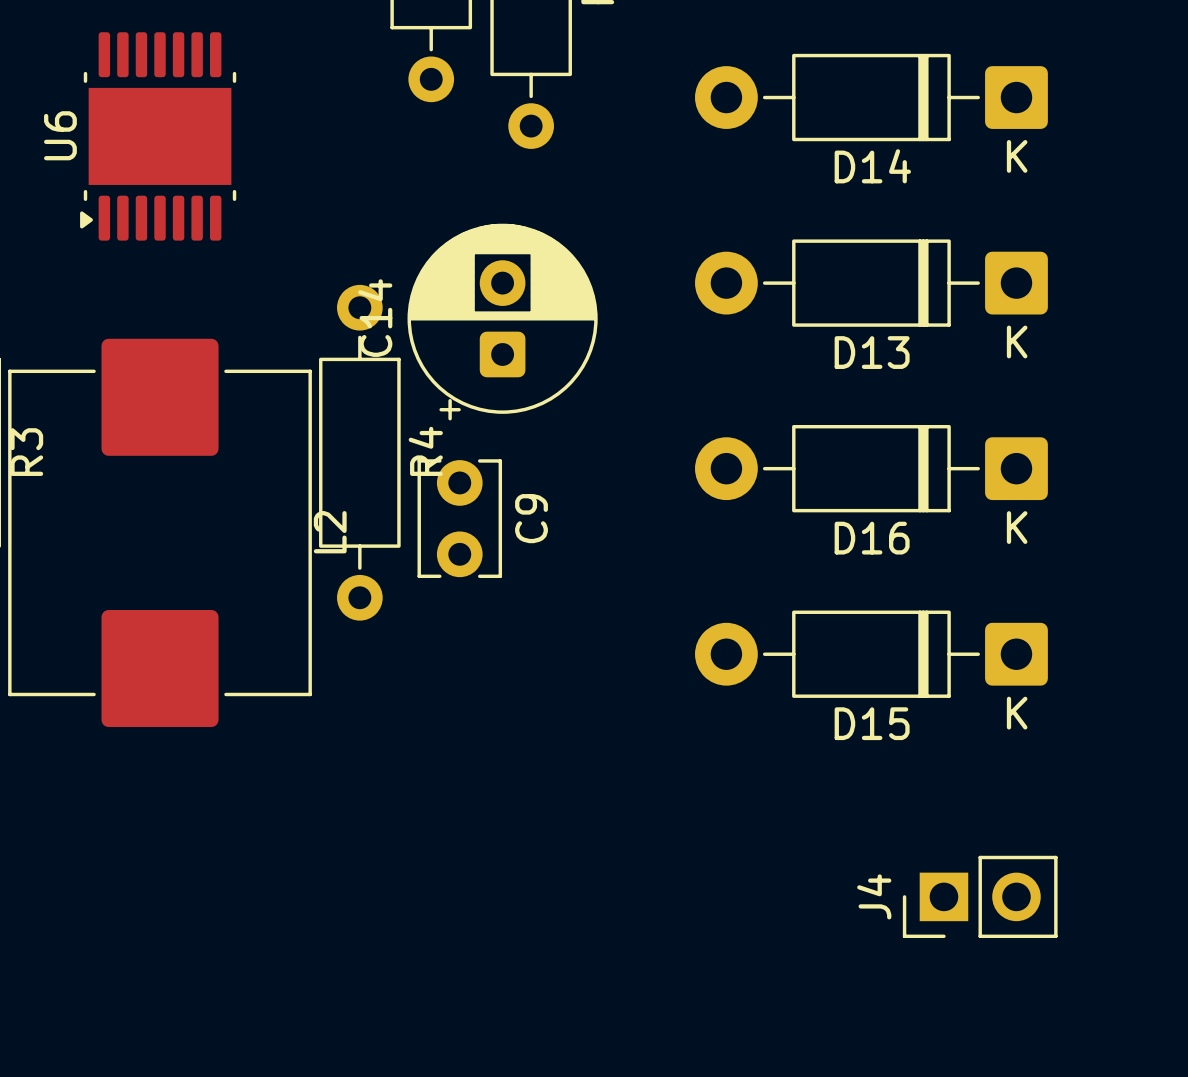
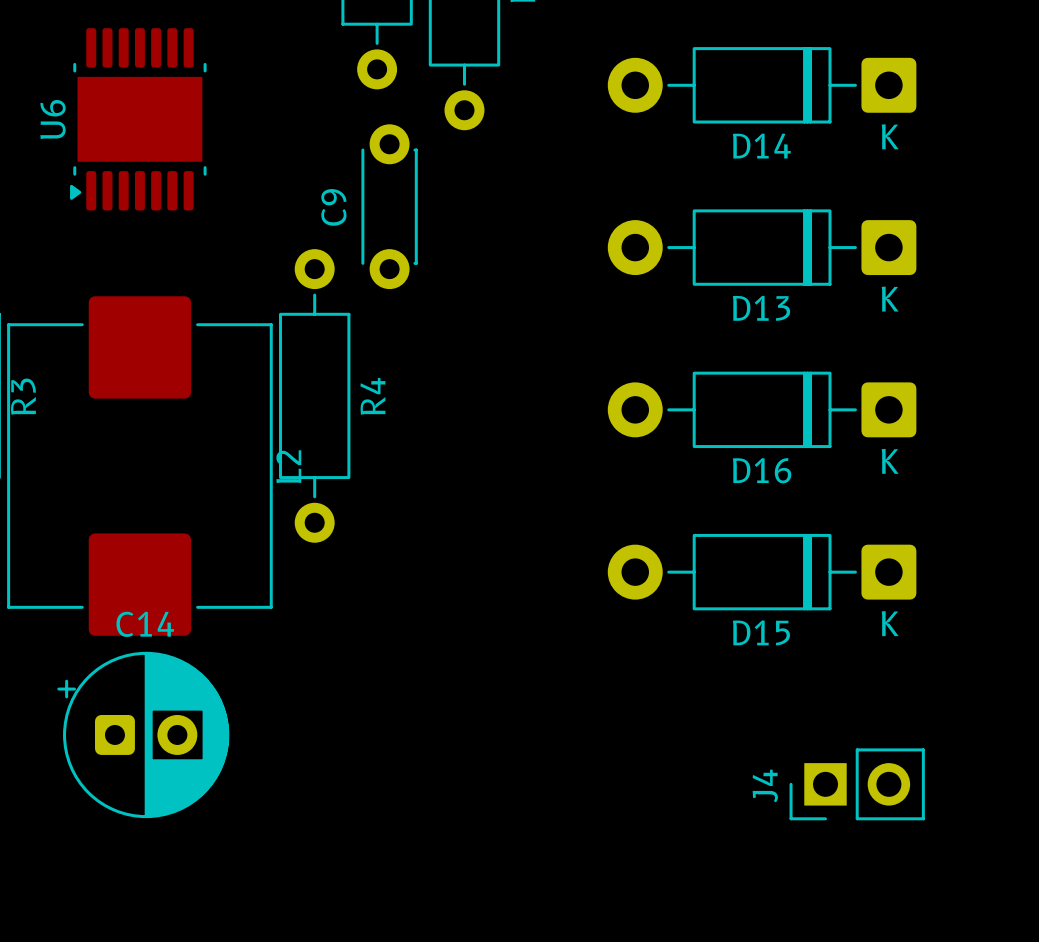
C14 rotation: 0° (502, 322) -> 90° clockwise (143, 734)
C14 position: (502, 322) -> (143, 734)
C9 footprint: [417, 459, 503, 579] -> [361, 124, 418, 290]
C9 name position: C9 (531, 518) -> C9 (333, 207)

